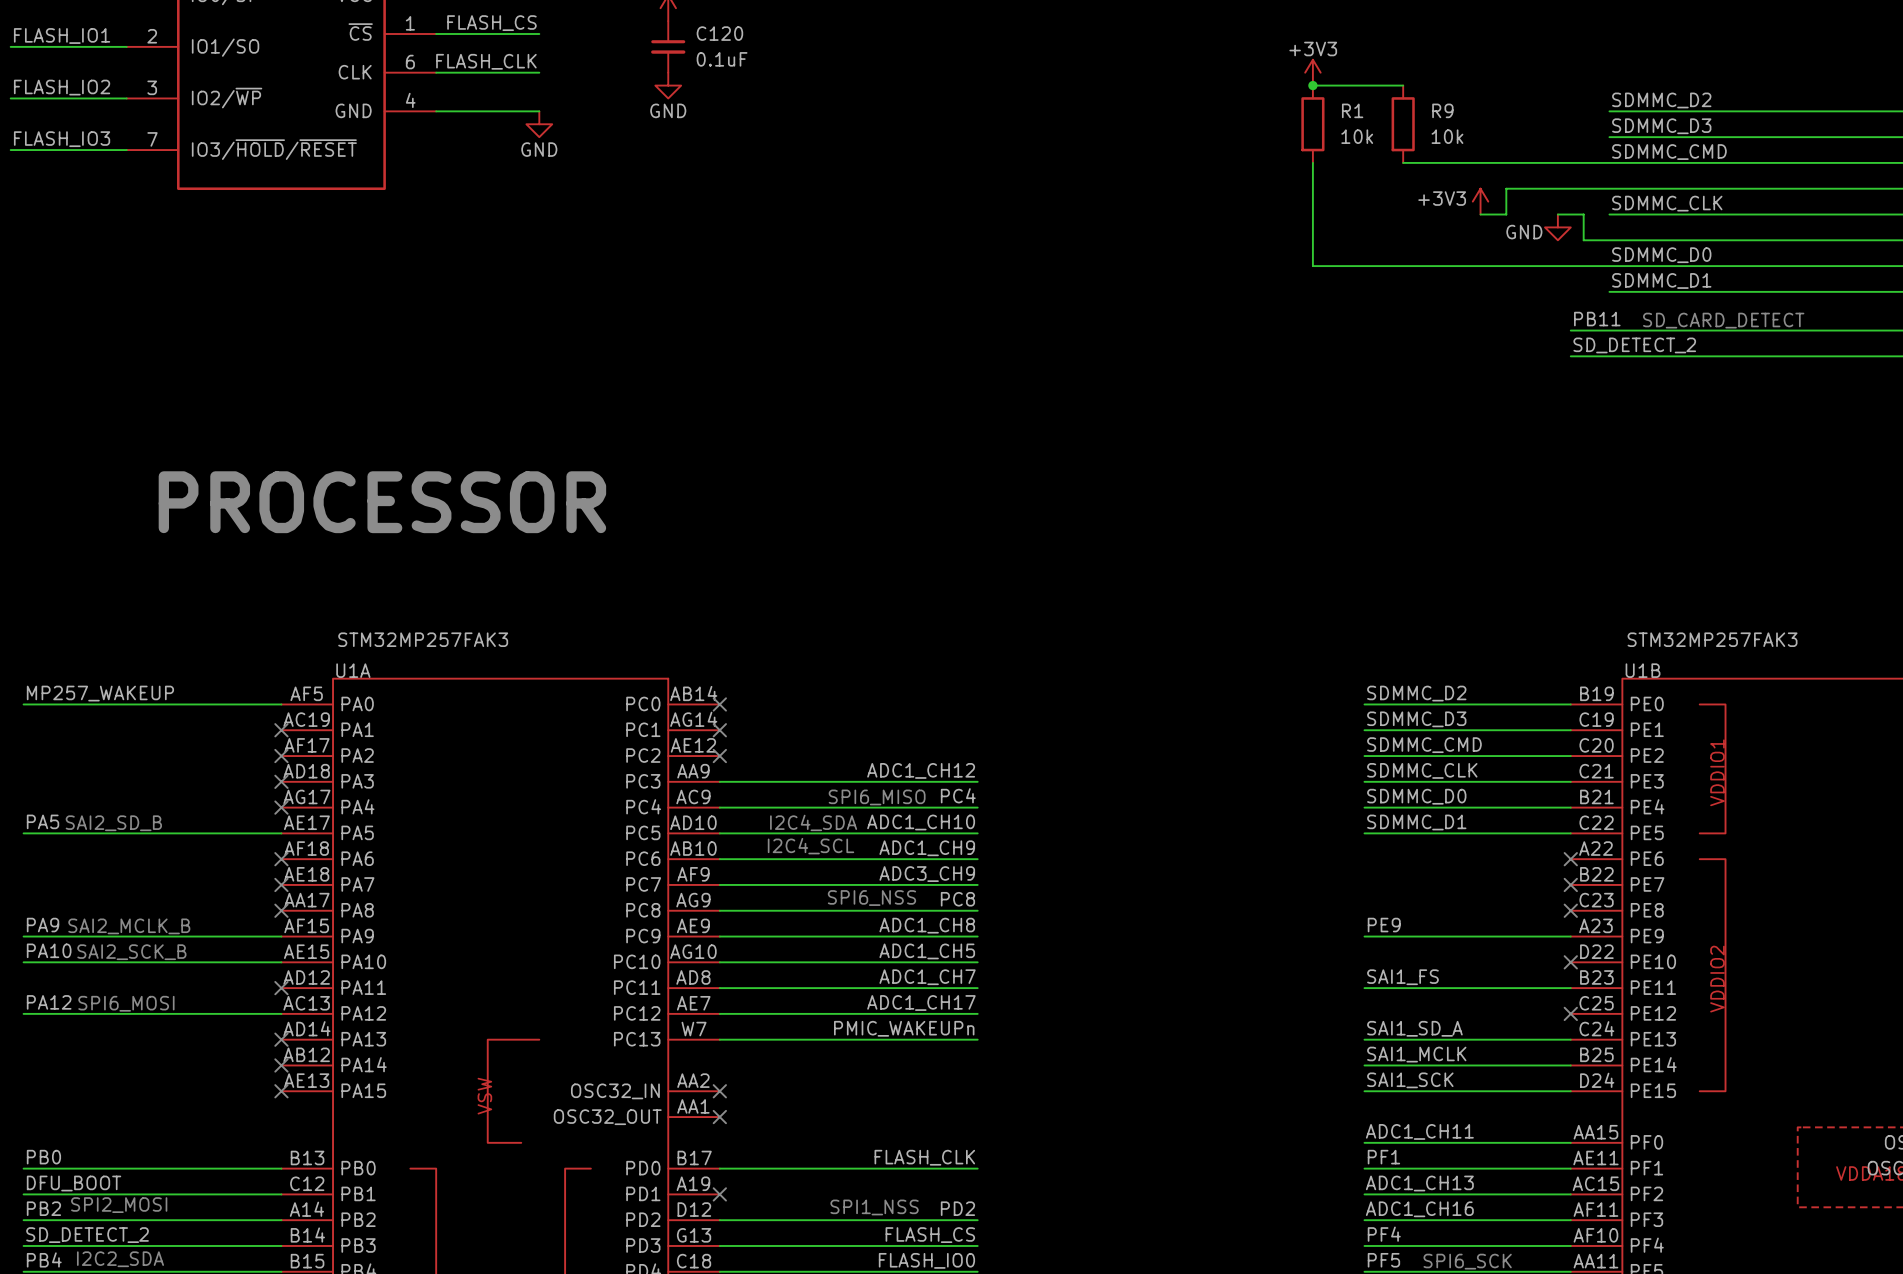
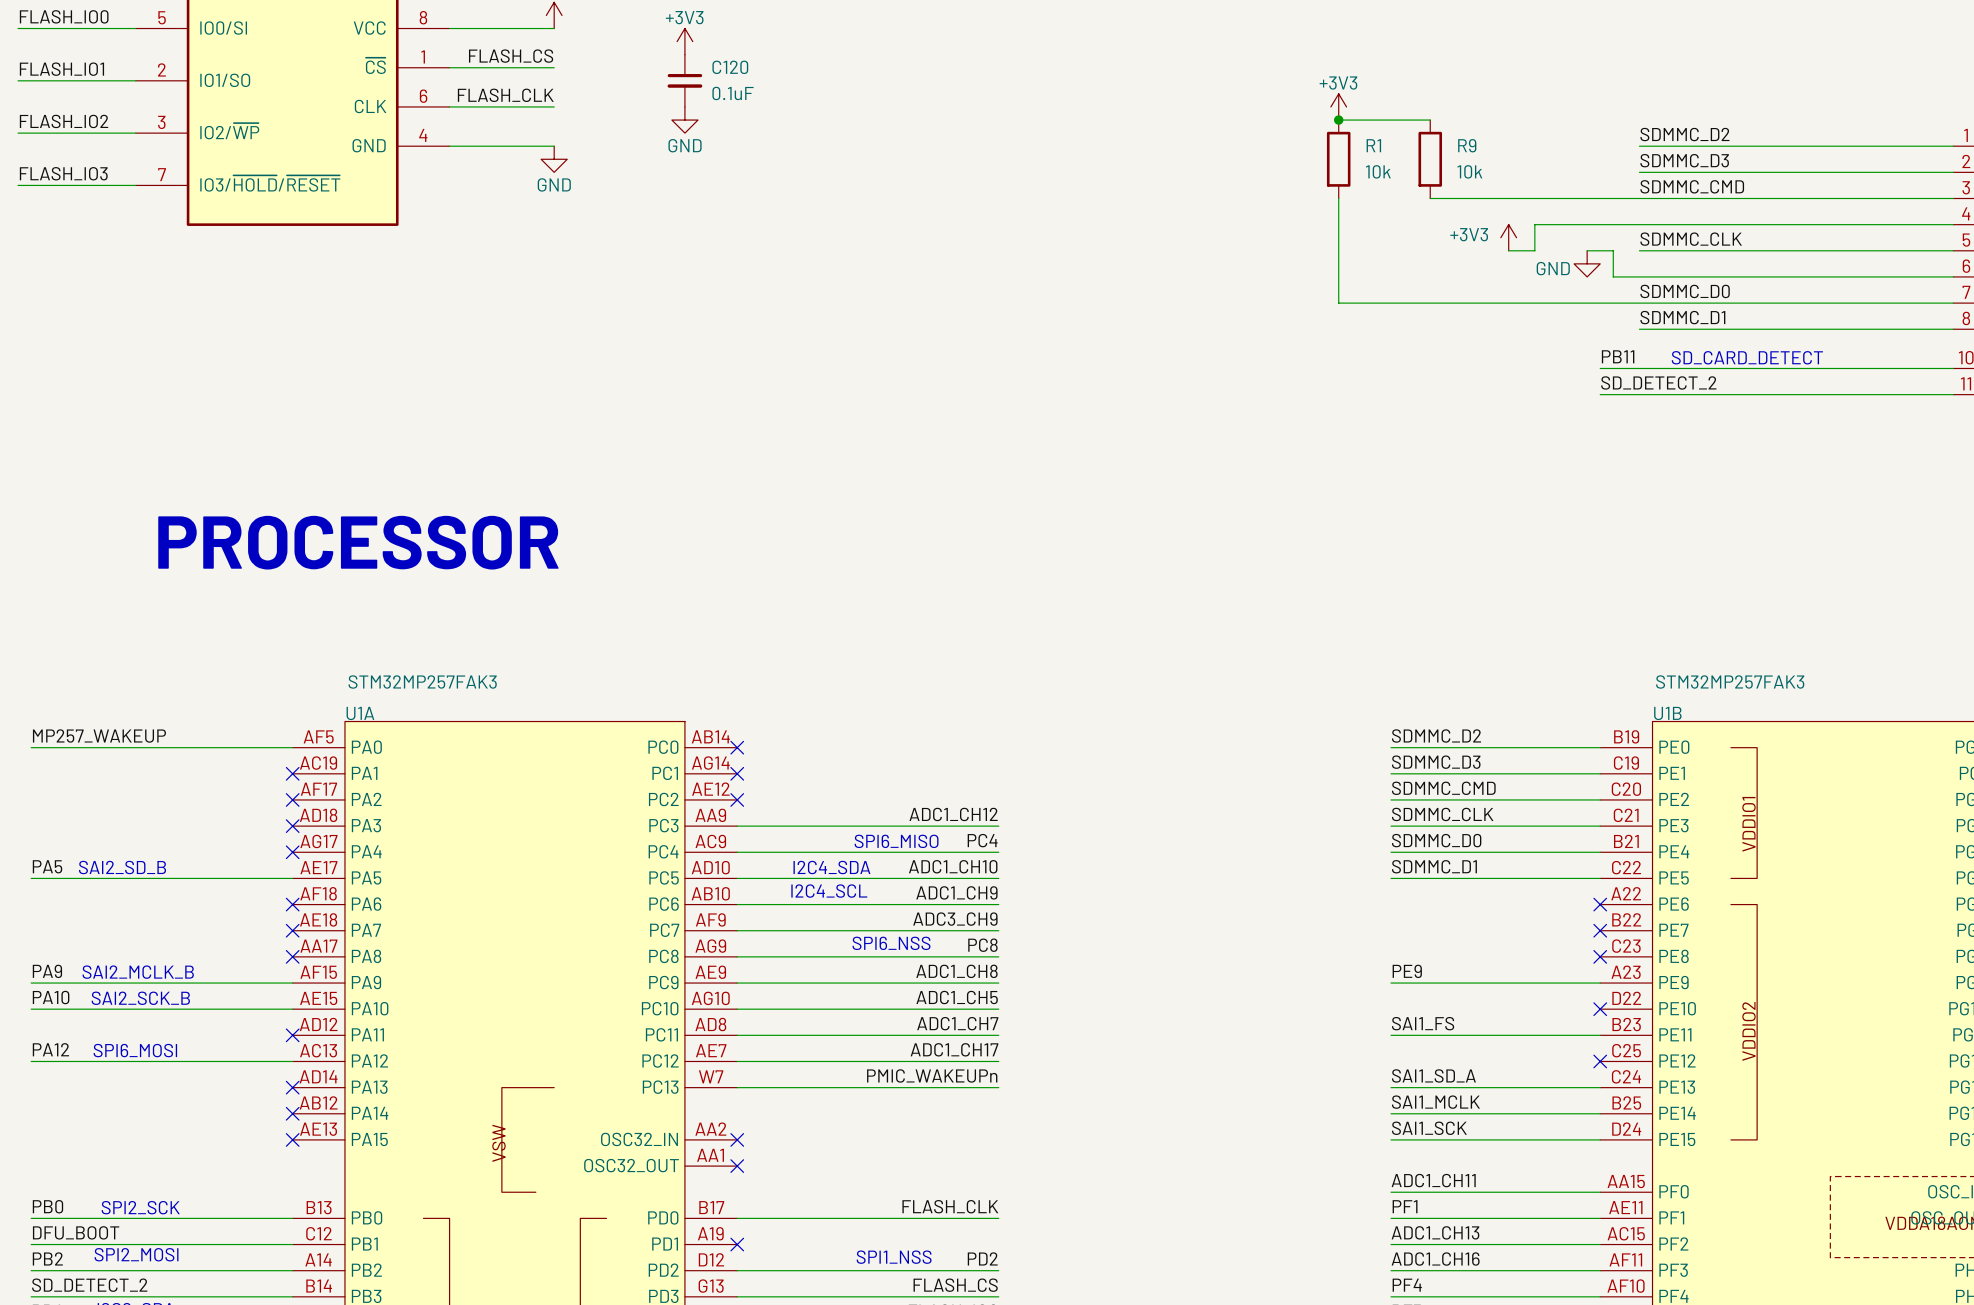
text: none -> SPI2_SCK (140, 1207)

